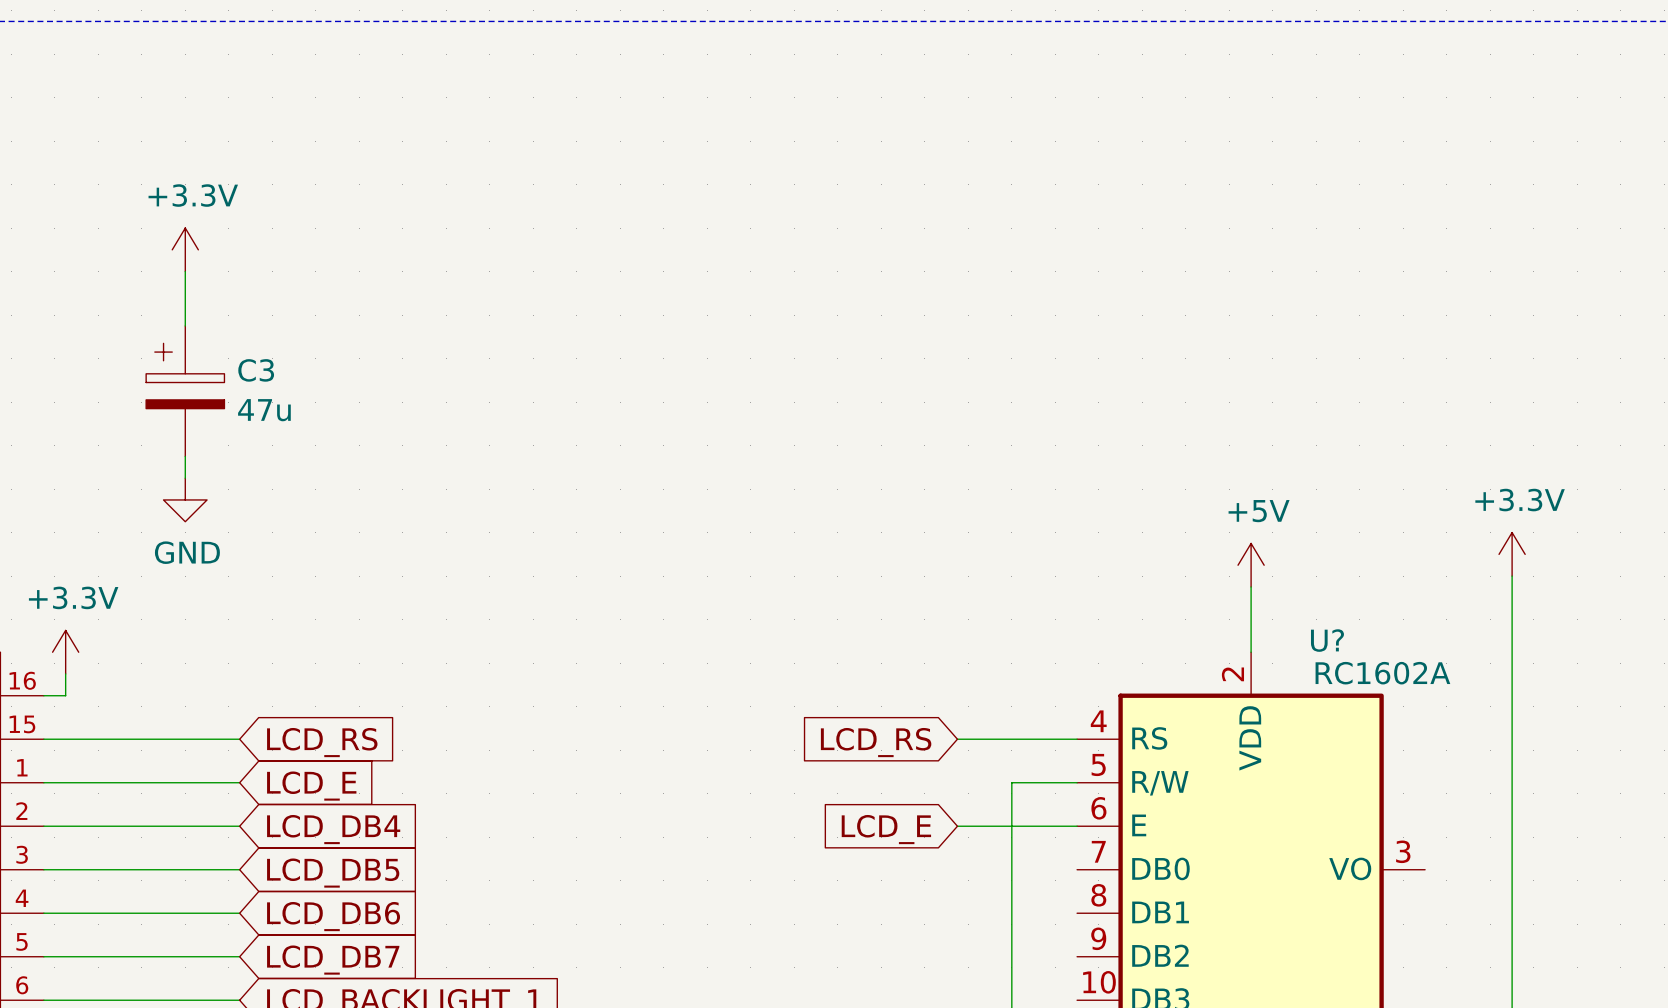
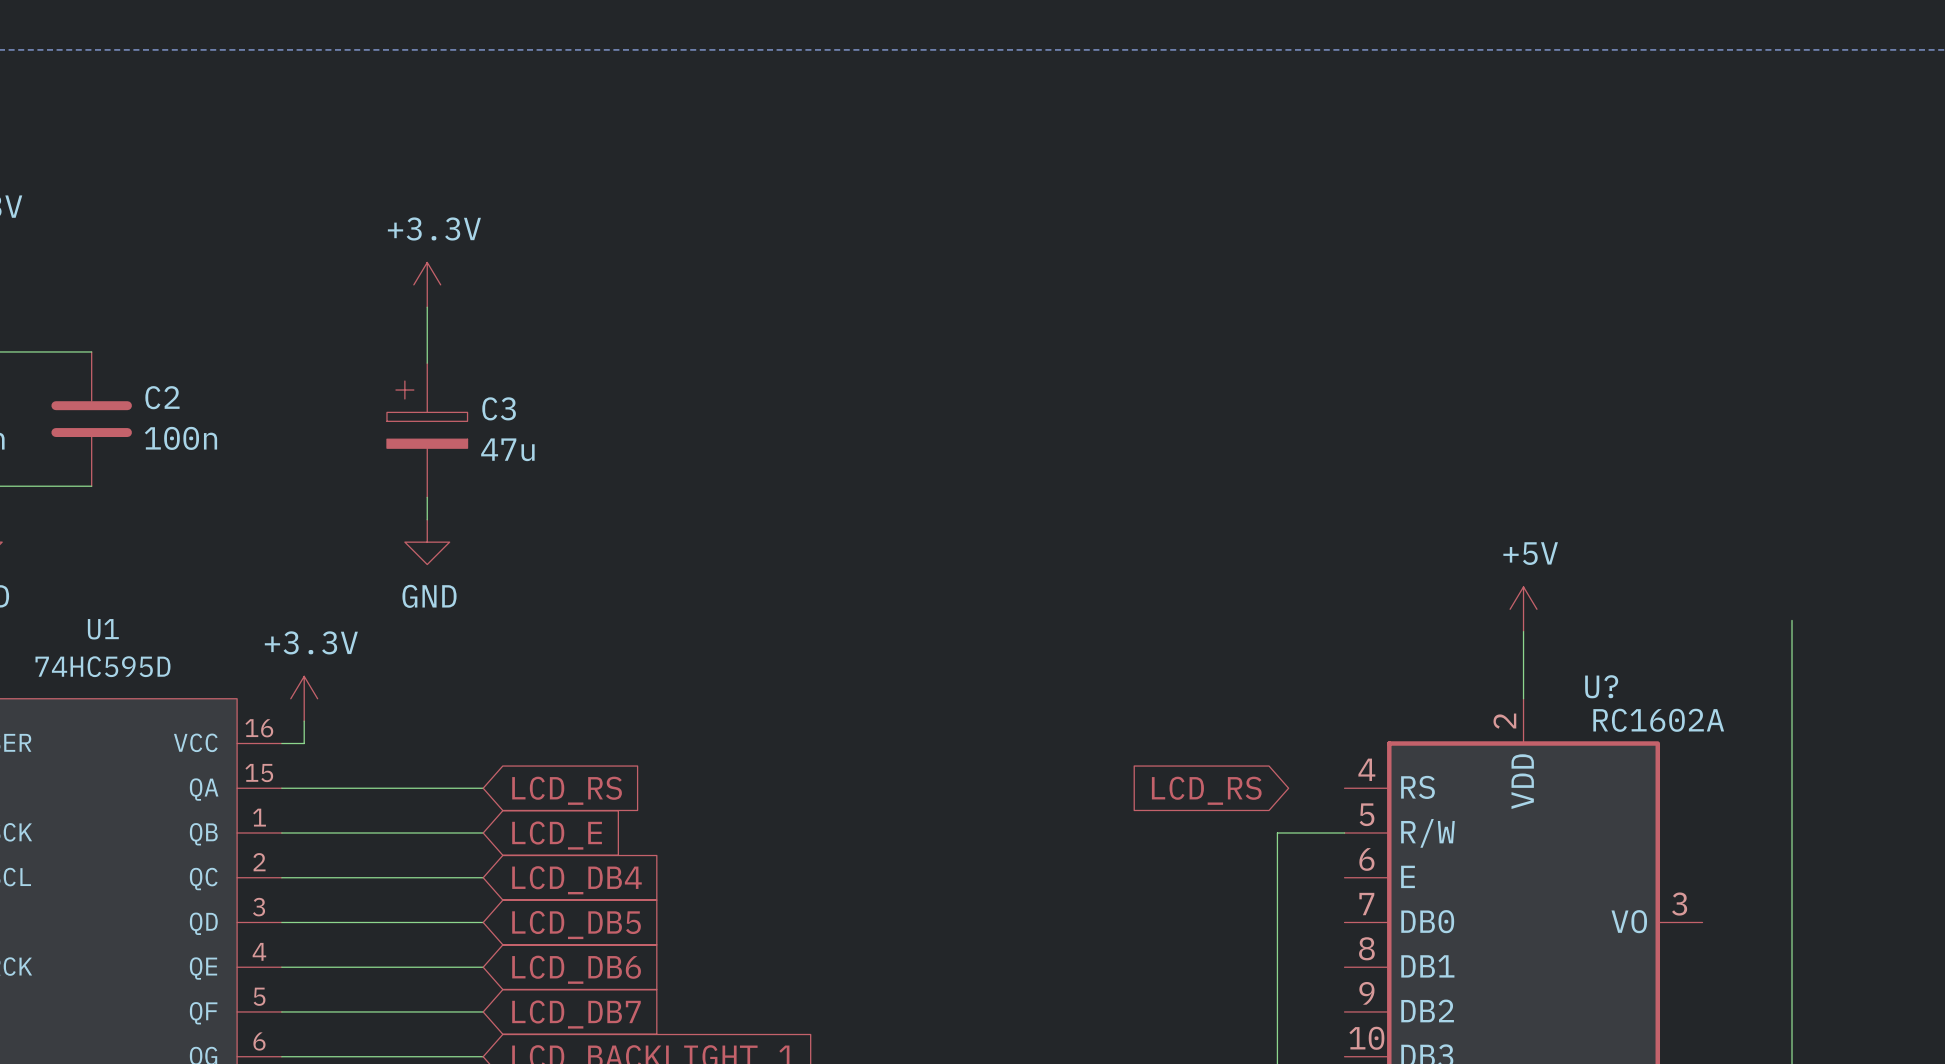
power symbol: +3.3V (1512, 554) -> none
wire: (957, 739) (1077, 739) -> none
global label position: LCD_RS (876, 742) -> LCD_RS (1206, 790)
wire: (957, 826) (1077, 826) -> none
global label: LCD_E (886, 829) -> none

